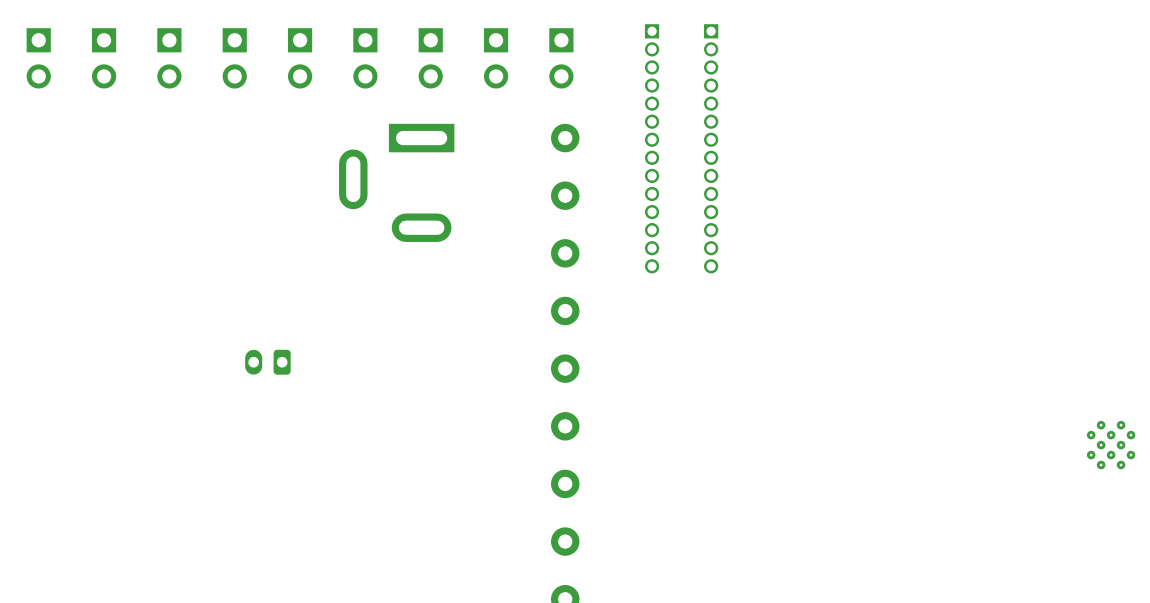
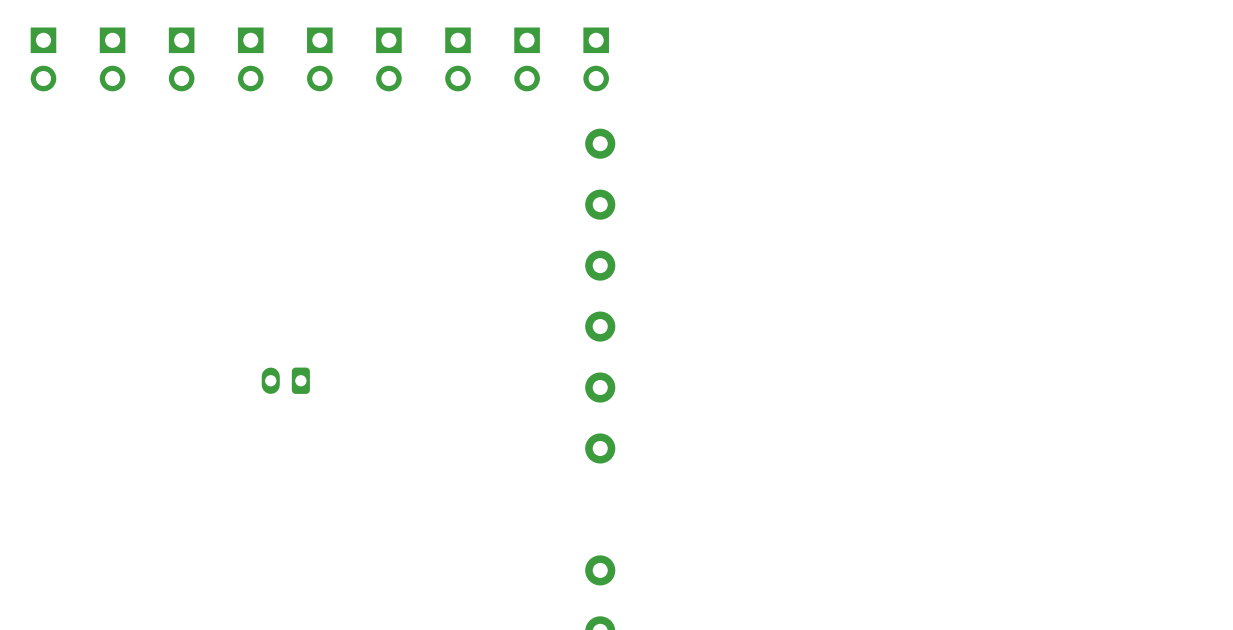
part: (652, 148) -> none
part: (711, 148) -> none
part: (396, 182) -> none
part: (1111, 445) -> none
part: (565, 483) -> none

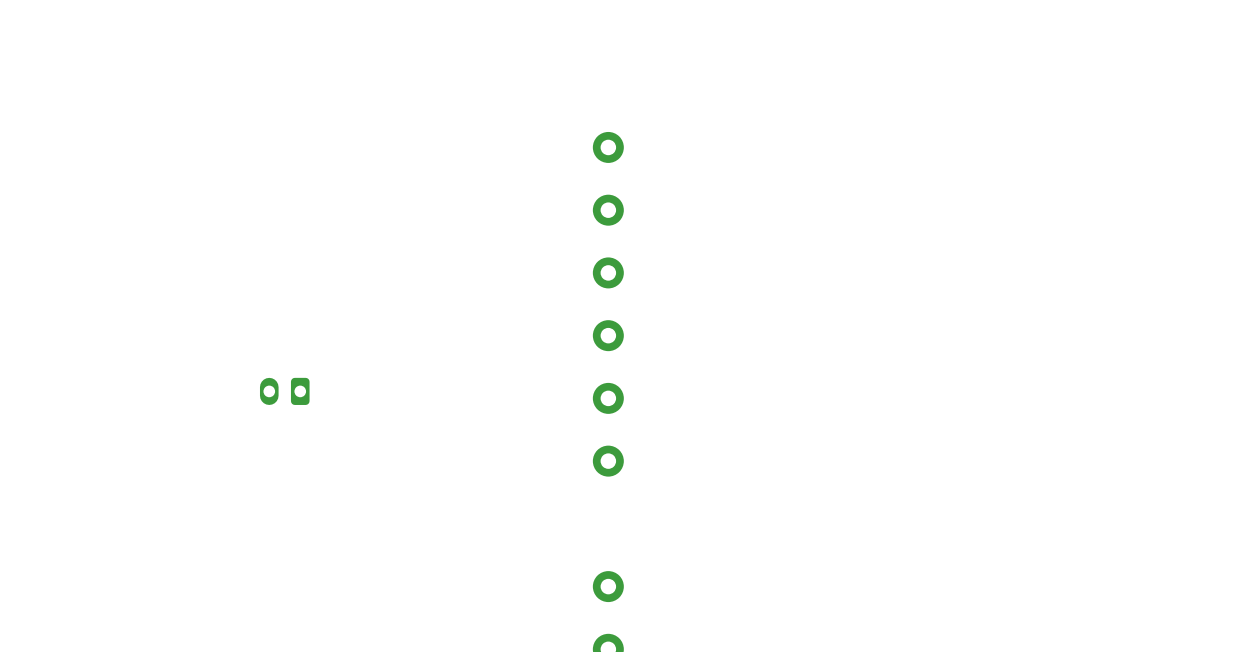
part: (43, 59) -> none
part: (112, 59) -> none
part: (181, 59) -> none
part: (250, 59) -> none
part: (319, 59) -> none
part: (388, 59) -> none
part: (458, 59) -> none
part: (527, 59) -> none
part: (596, 59) -> none

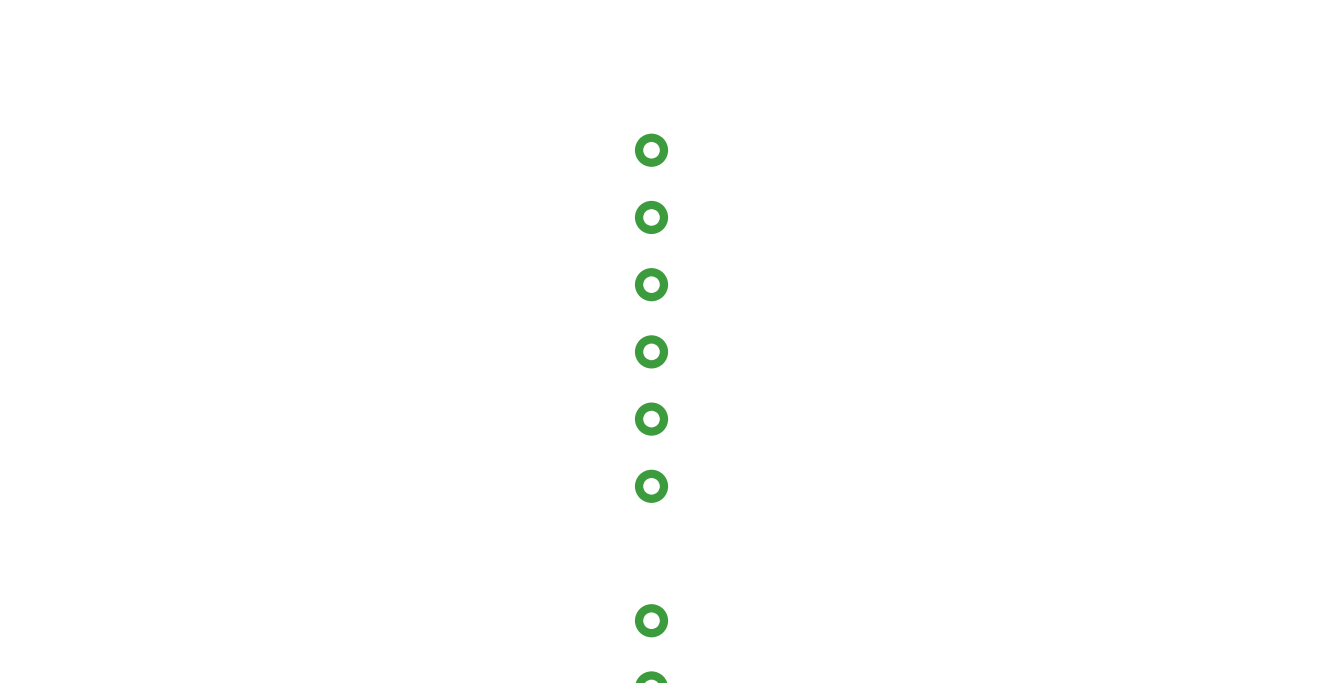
part: (284, 391) -> none

